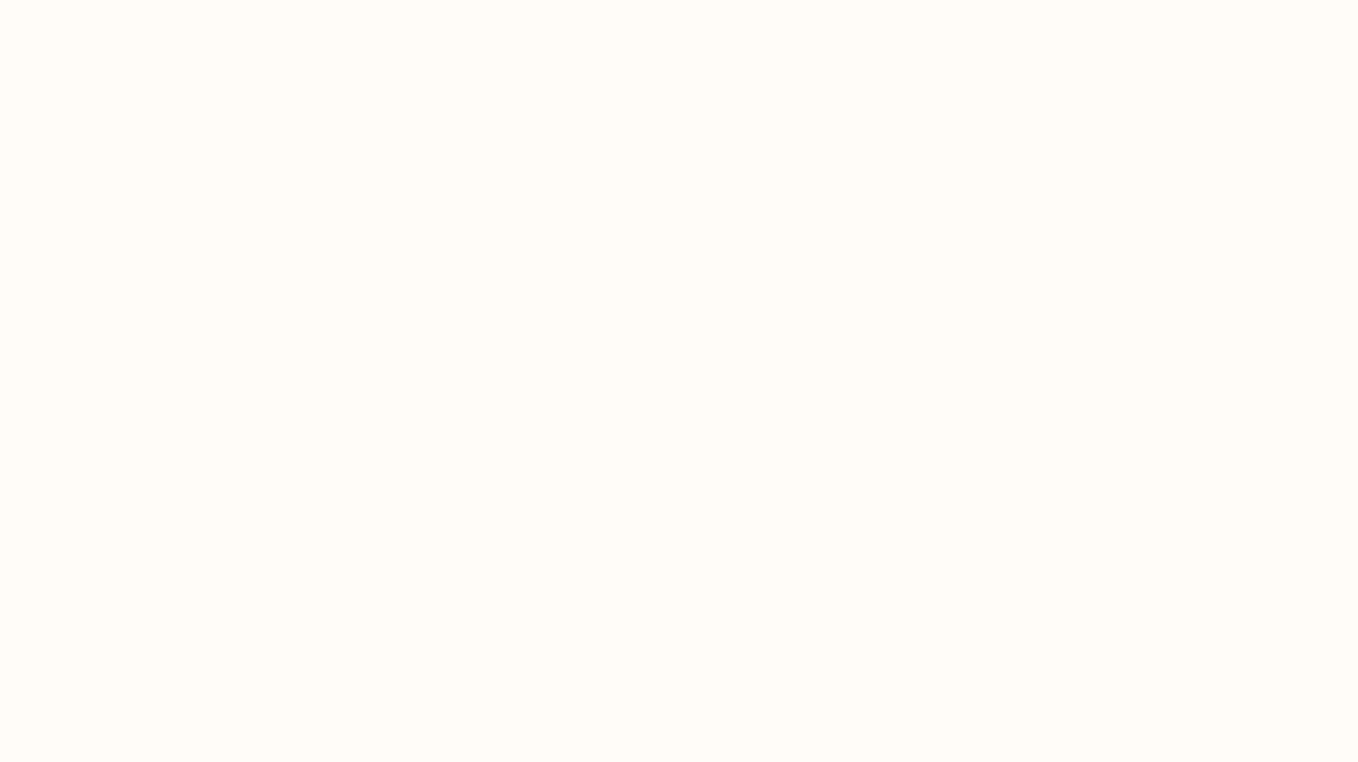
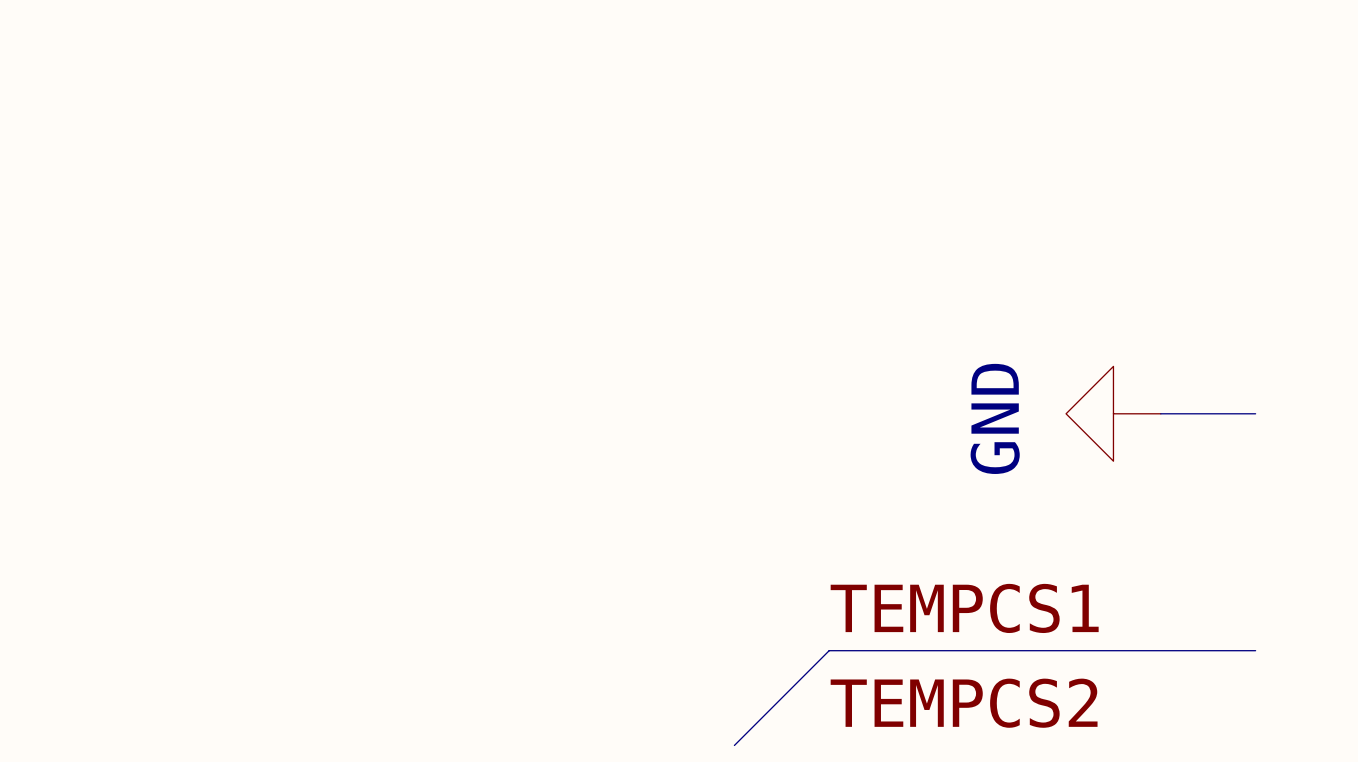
power symbol: none -> GND (1113, 413)
wire: none -> (1160, 413) (1255, 413)
label: none -> TEMPCS1 (964, 608)
wire: none -> (1255, 650) (829, 650) (734, 745)
label: none -> TEMPCS2 (964, 703)

